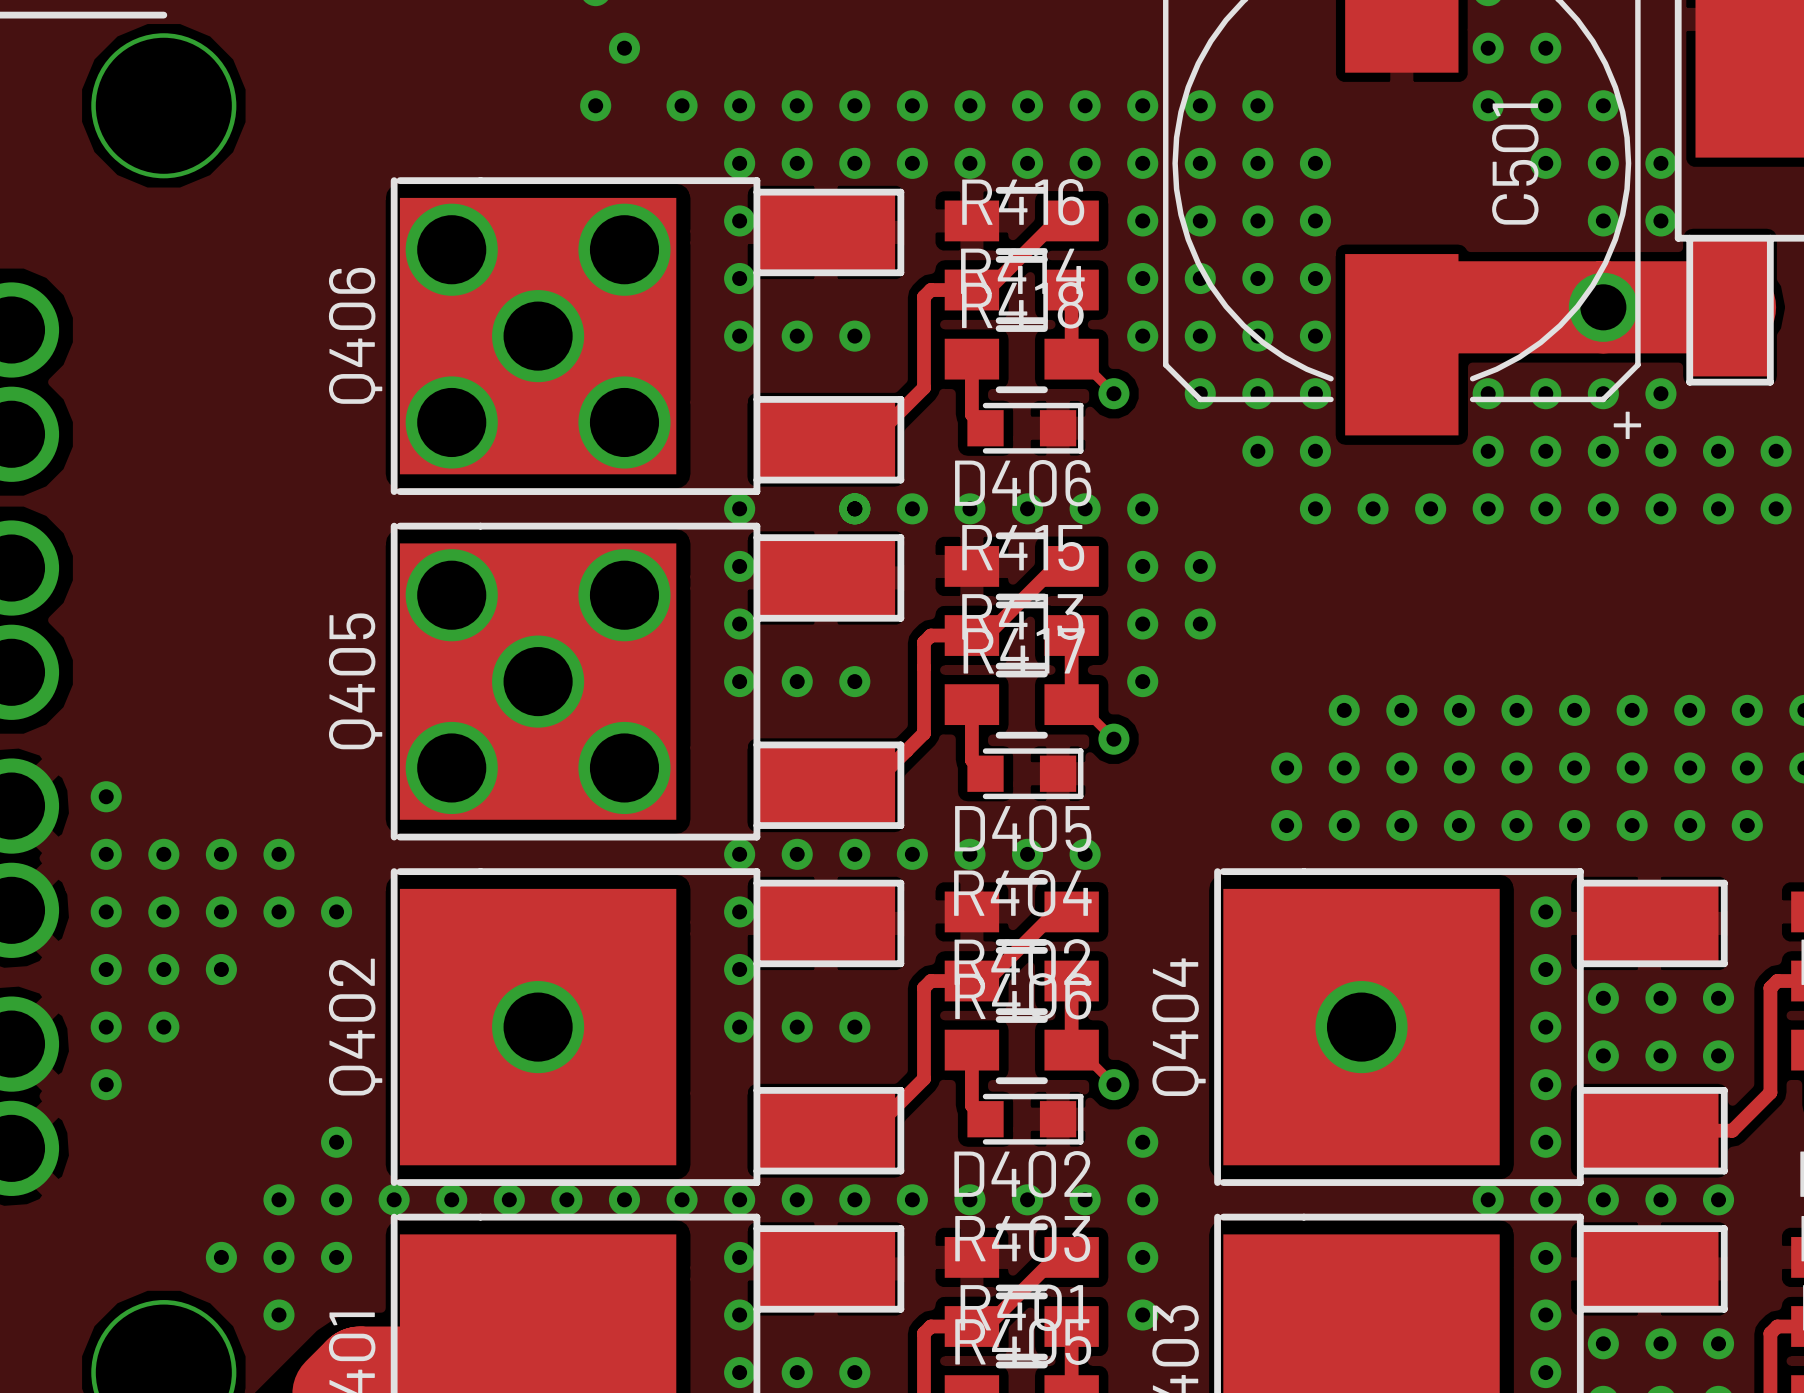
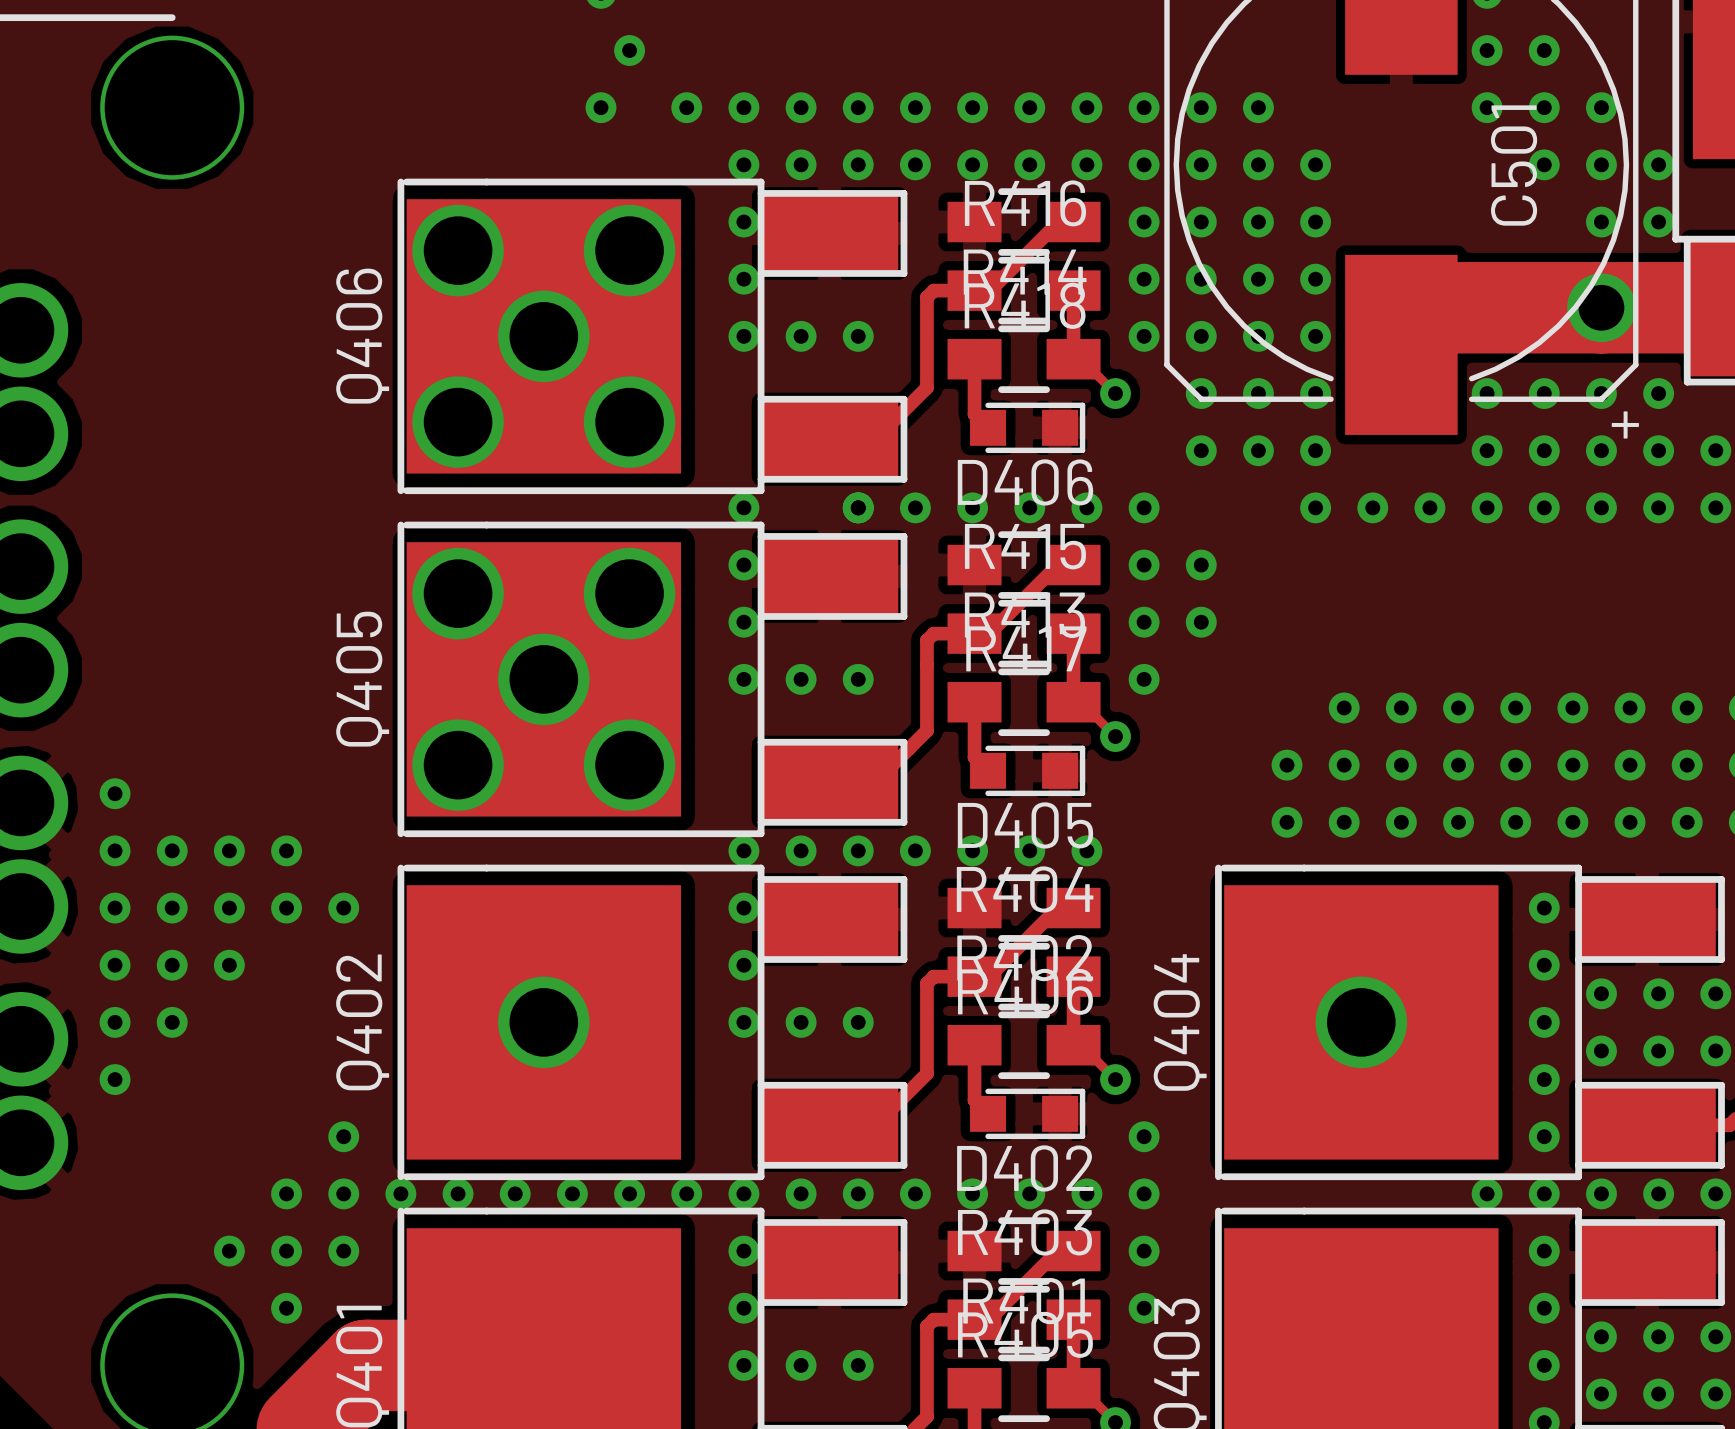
part: none -> (1201, 450)

